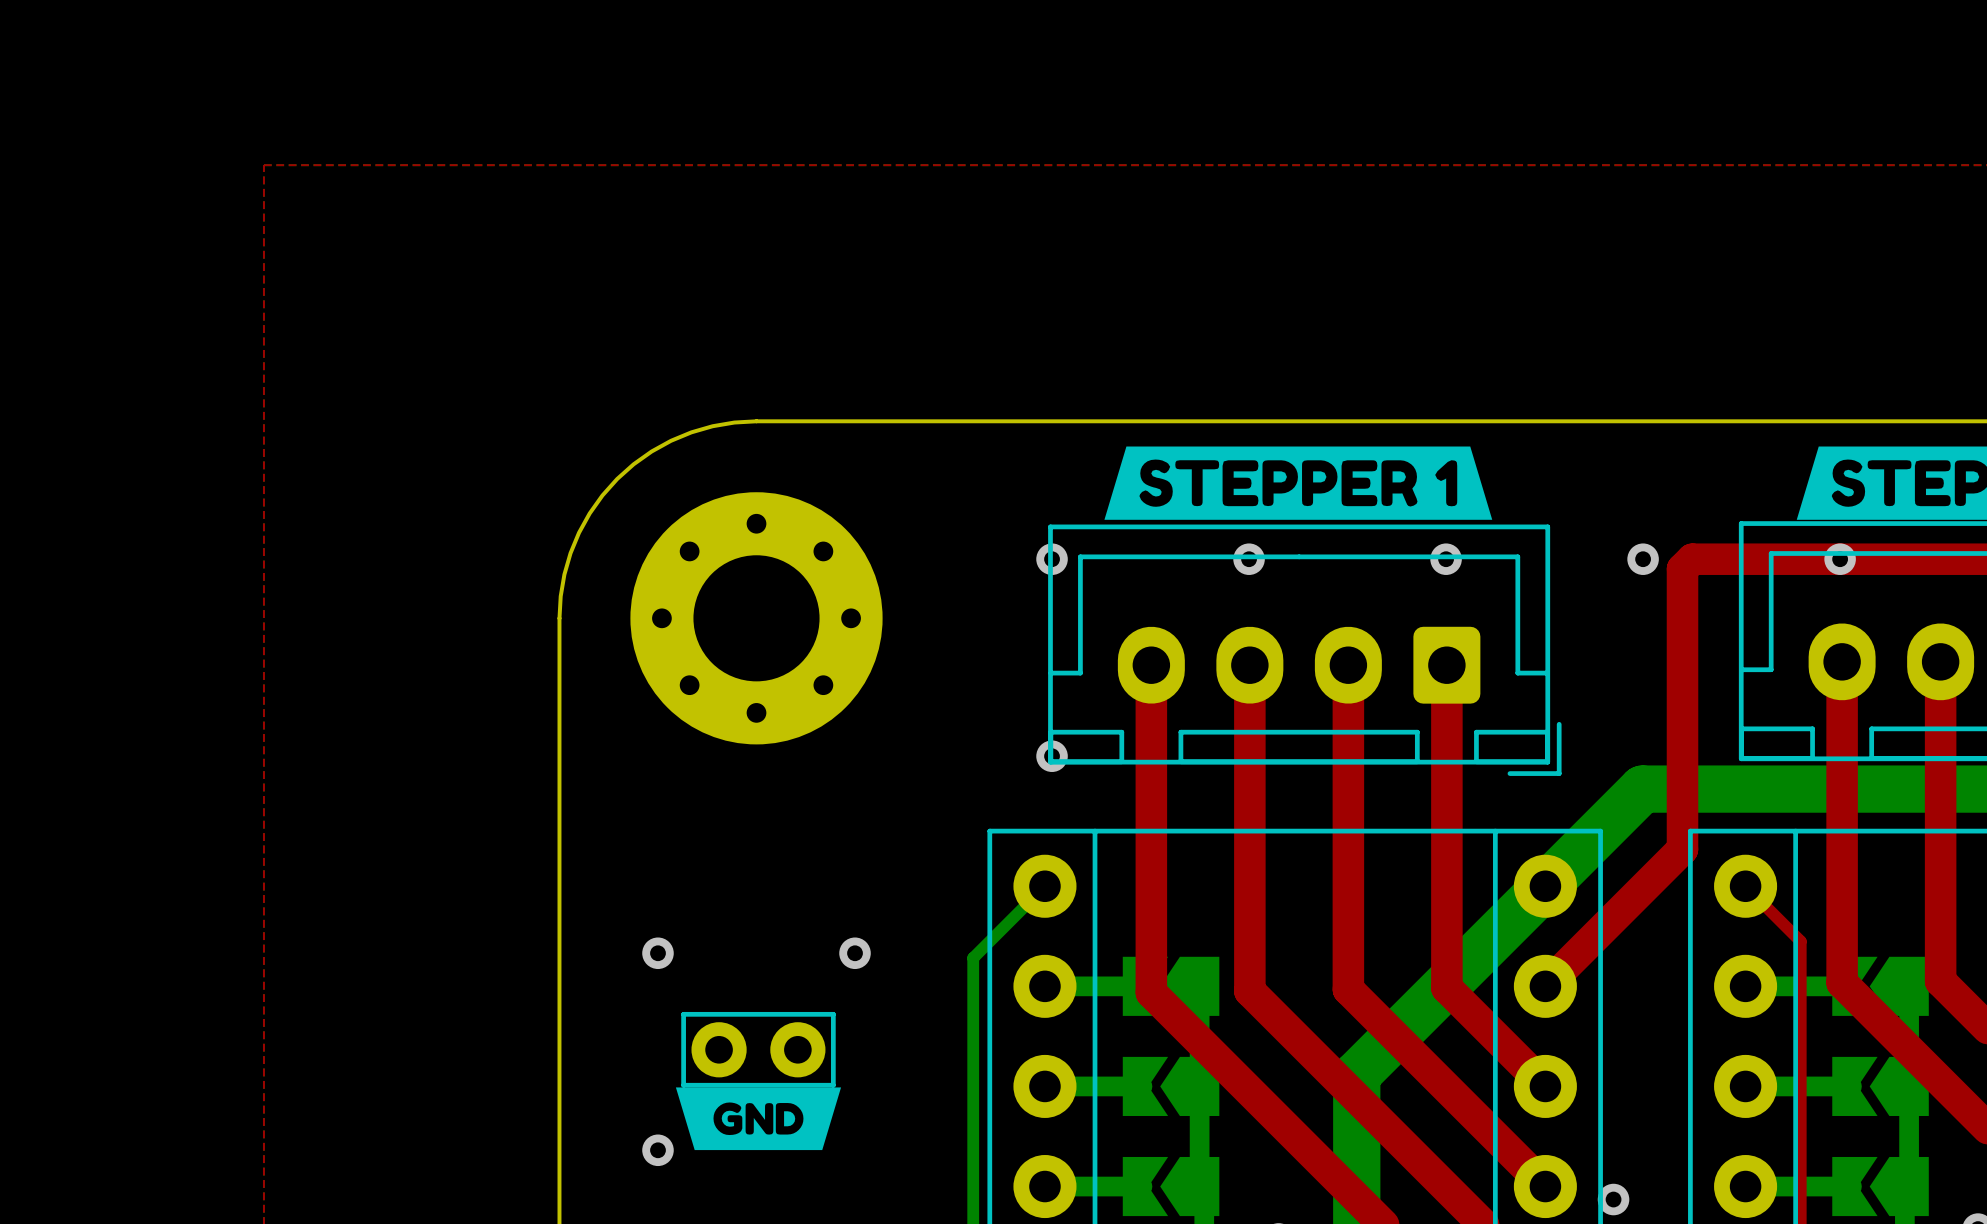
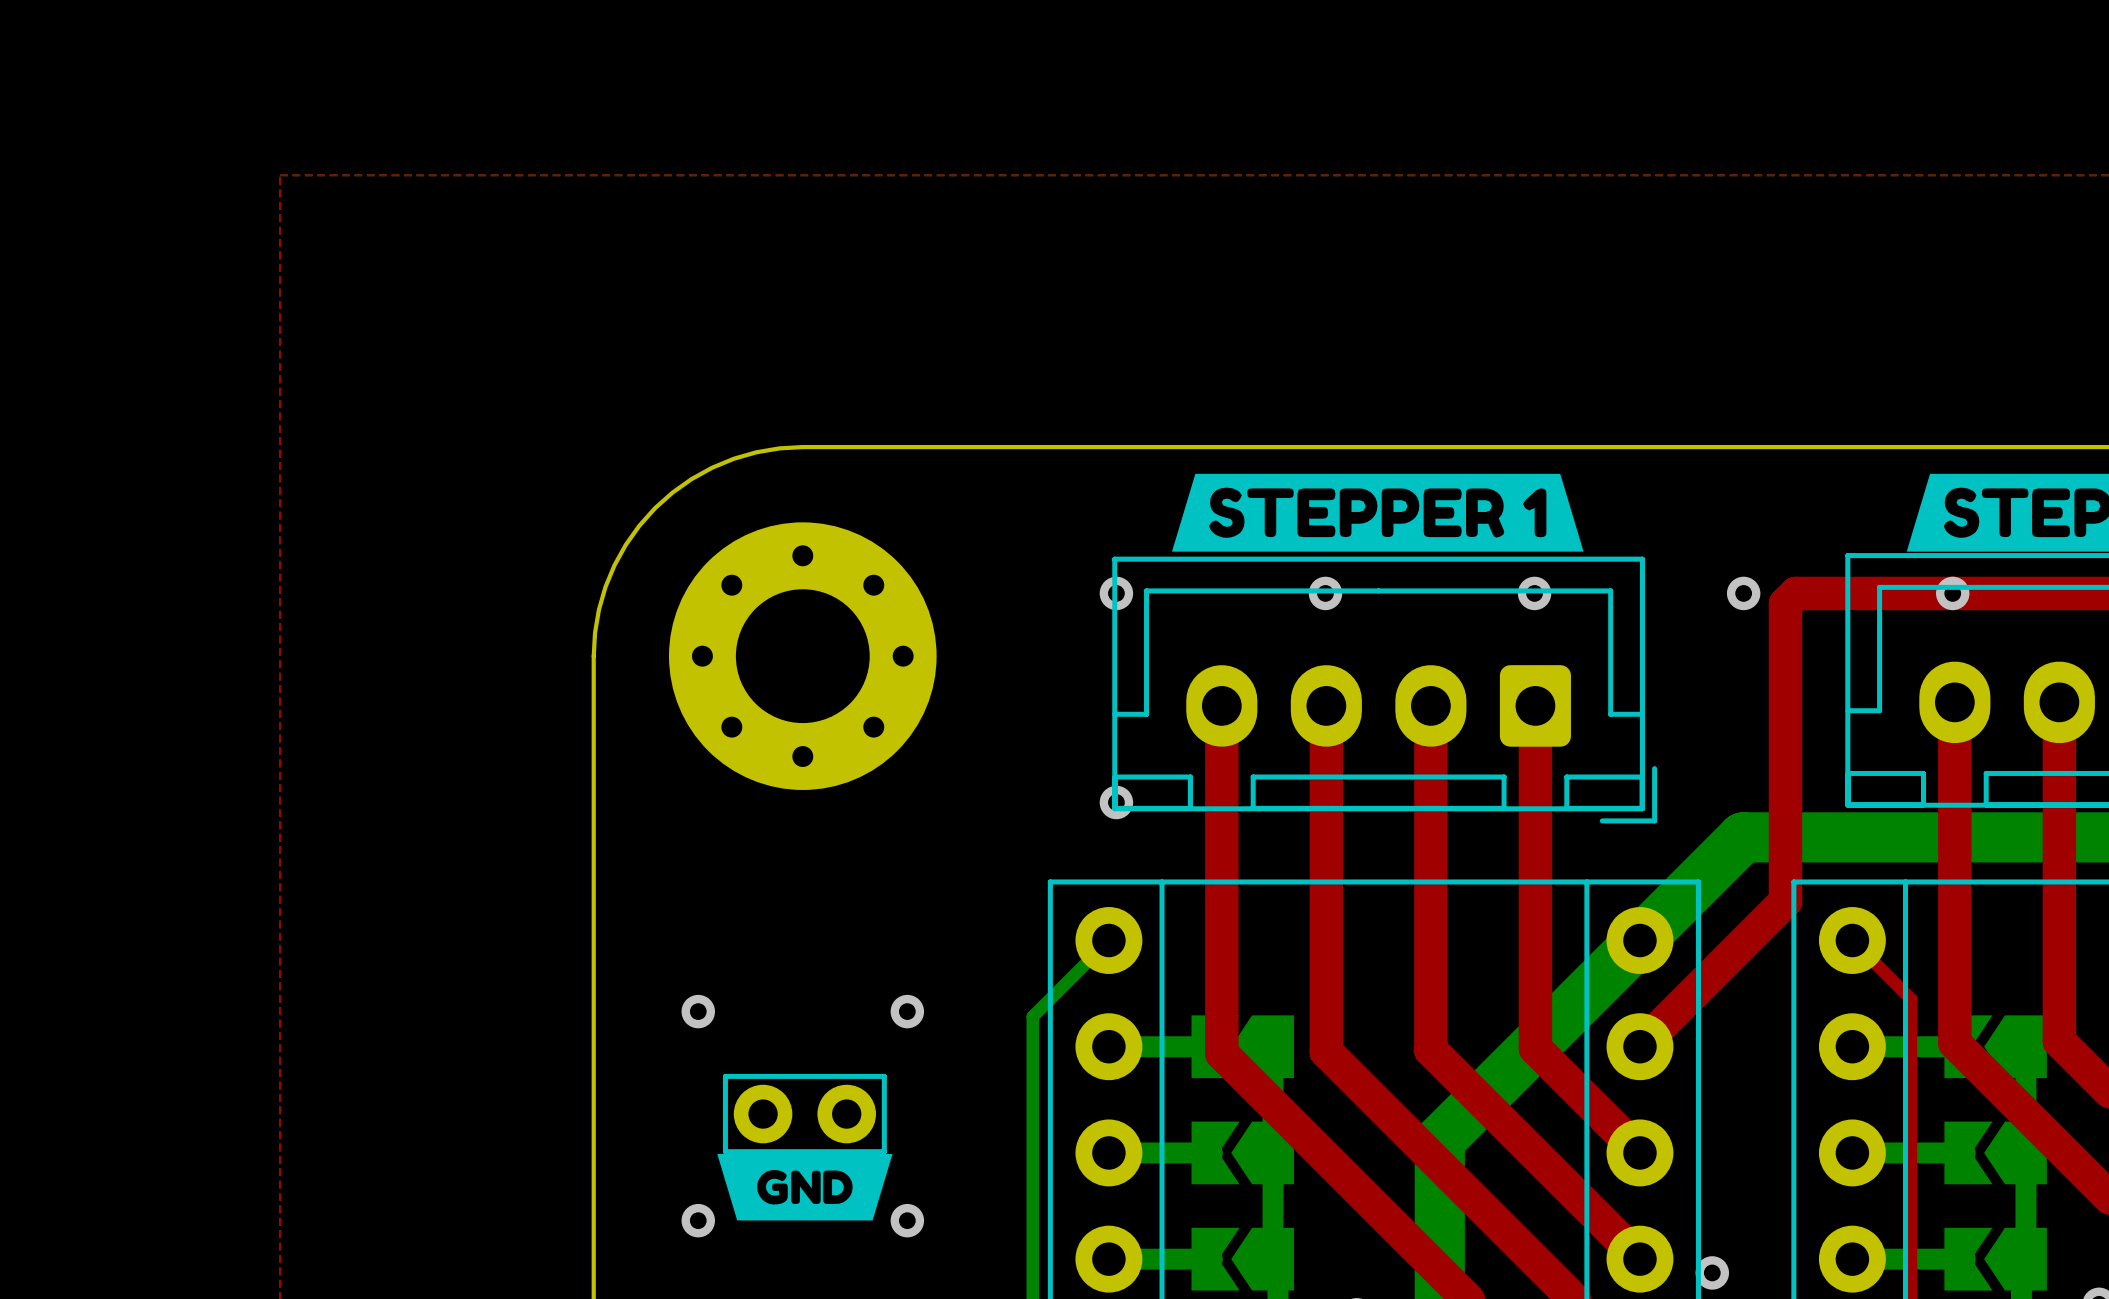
via: none -> (907, 1220)

